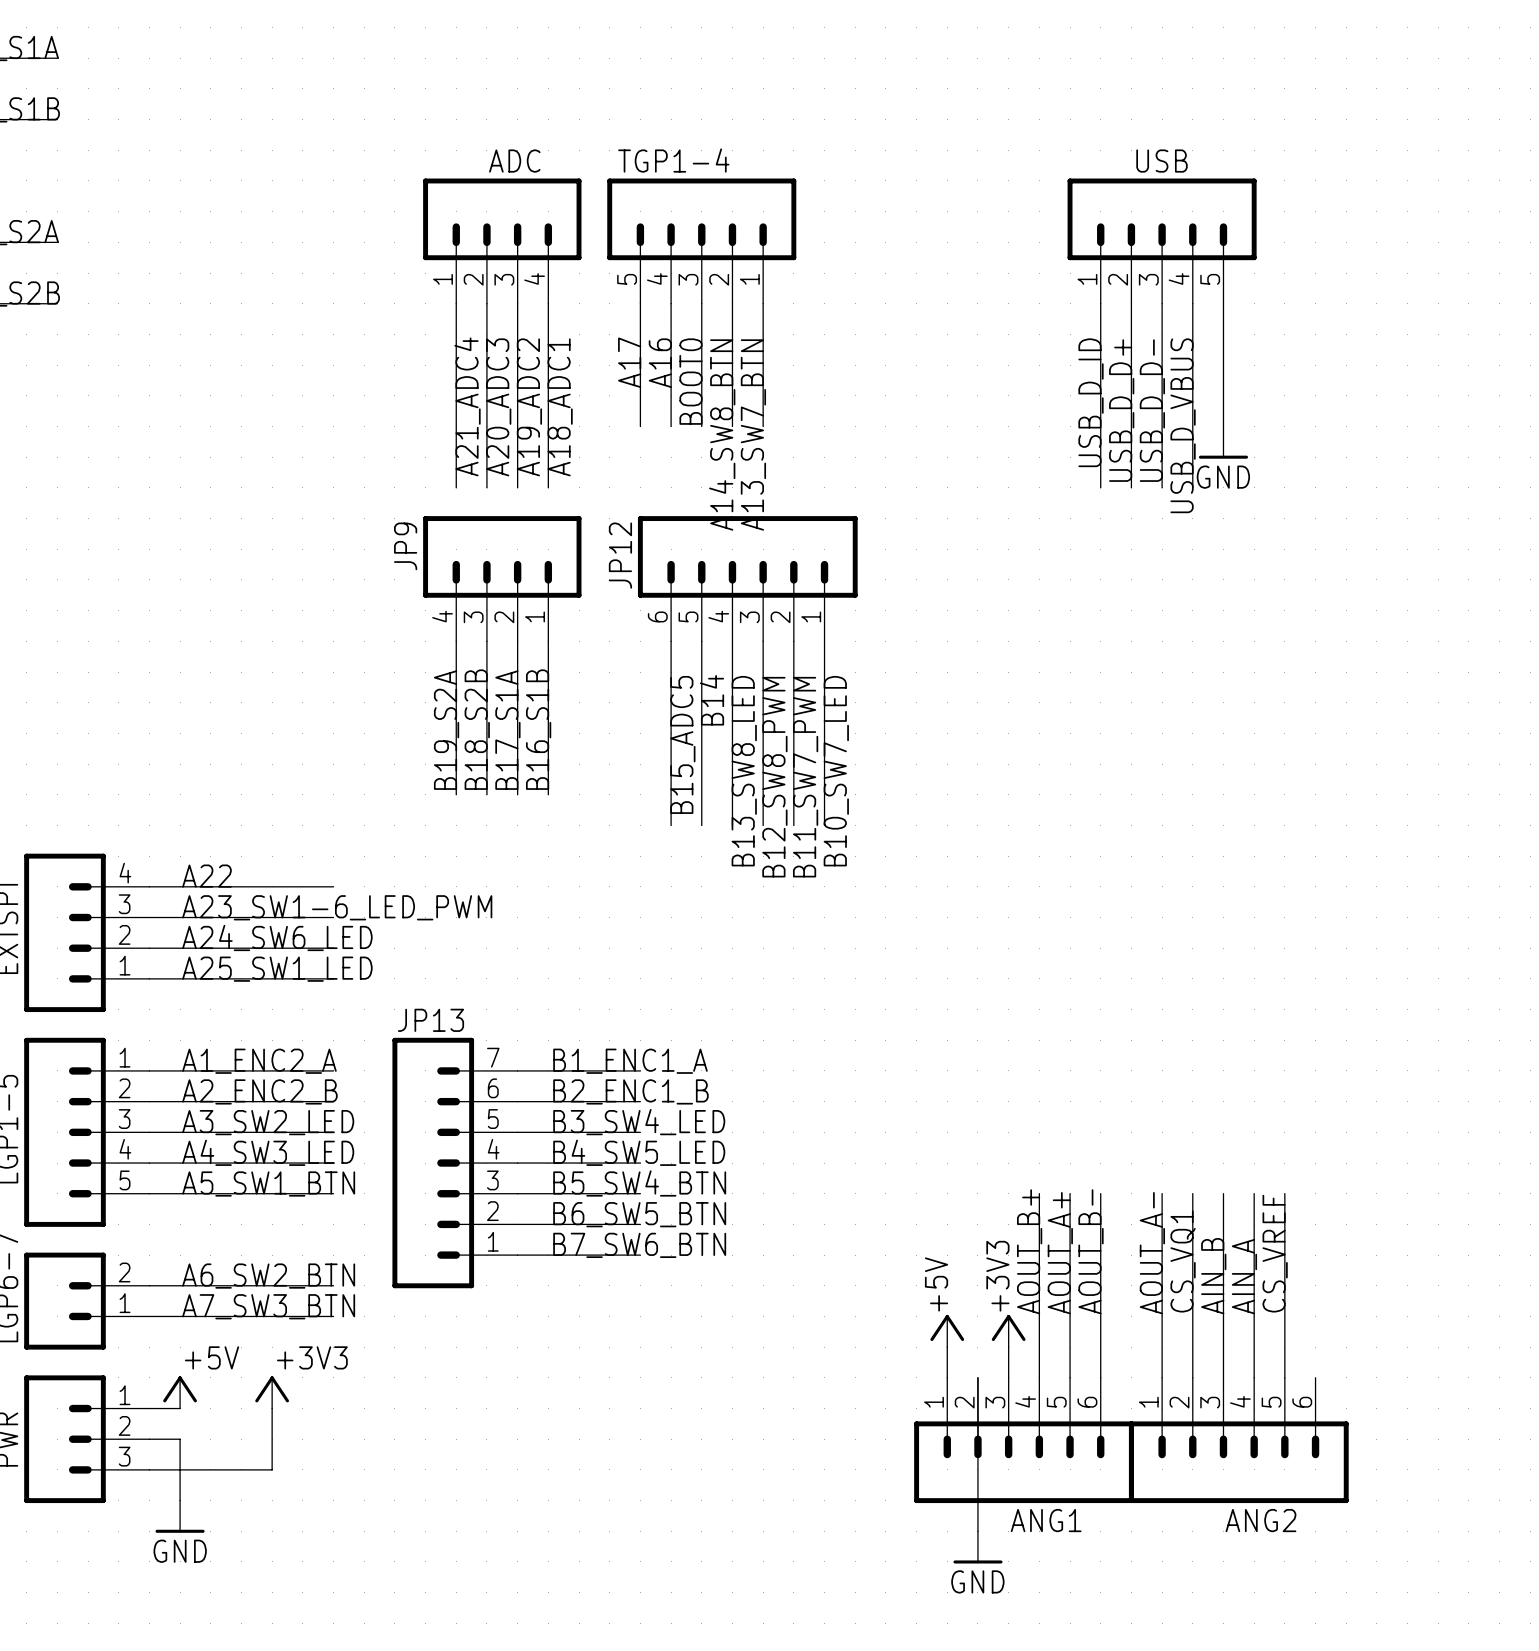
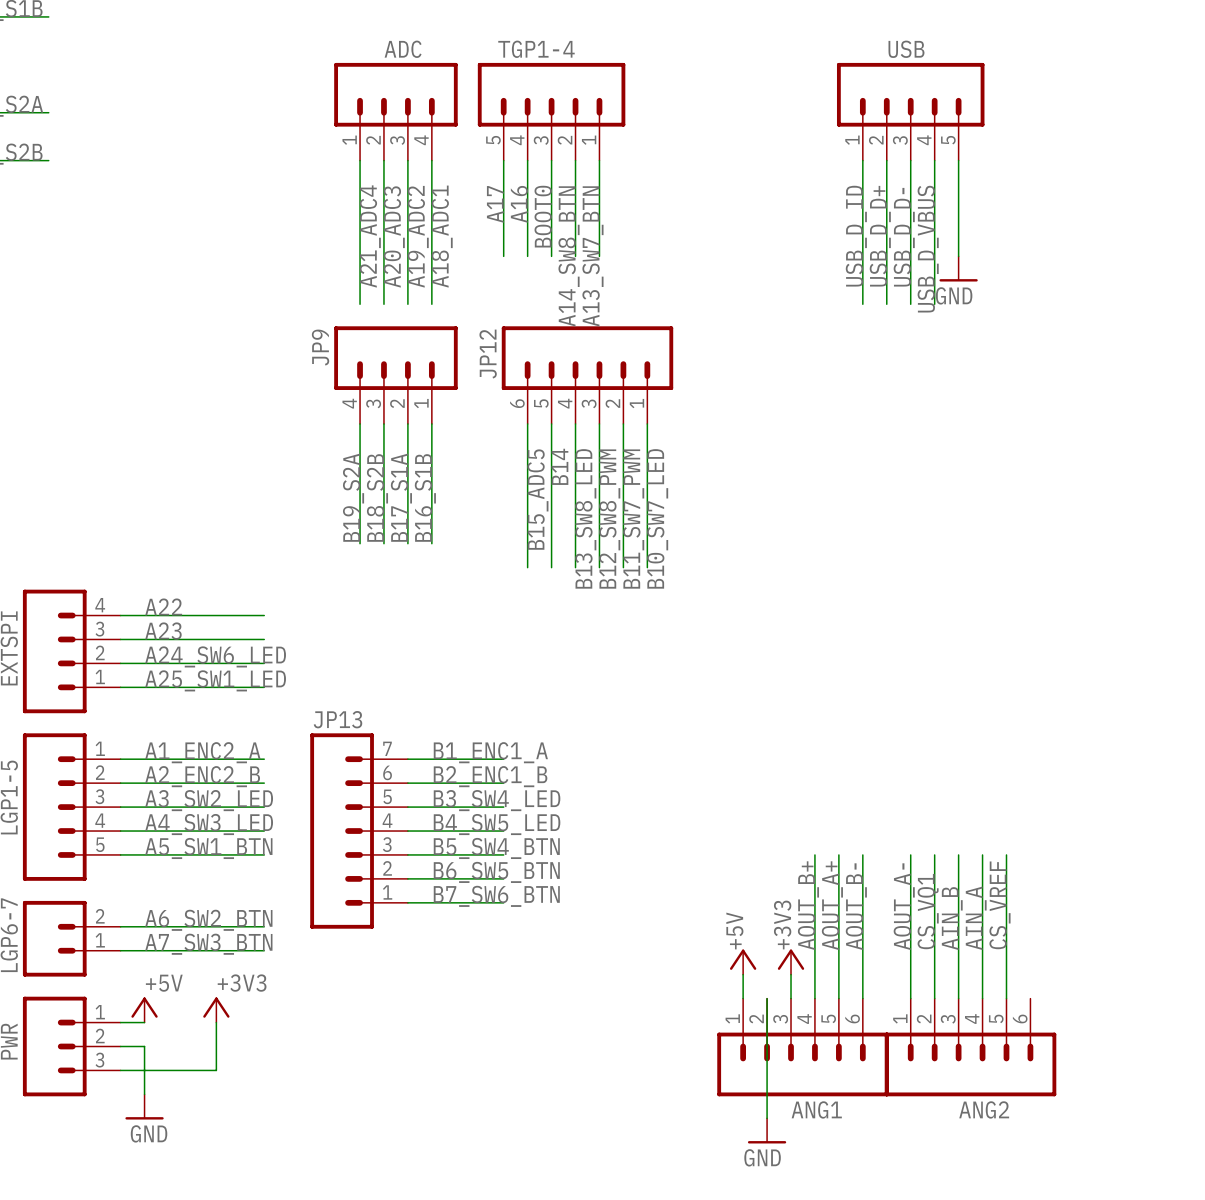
label: A23_SW1-6_LED_PWM (337, 907) -> A23 (163, 631)

